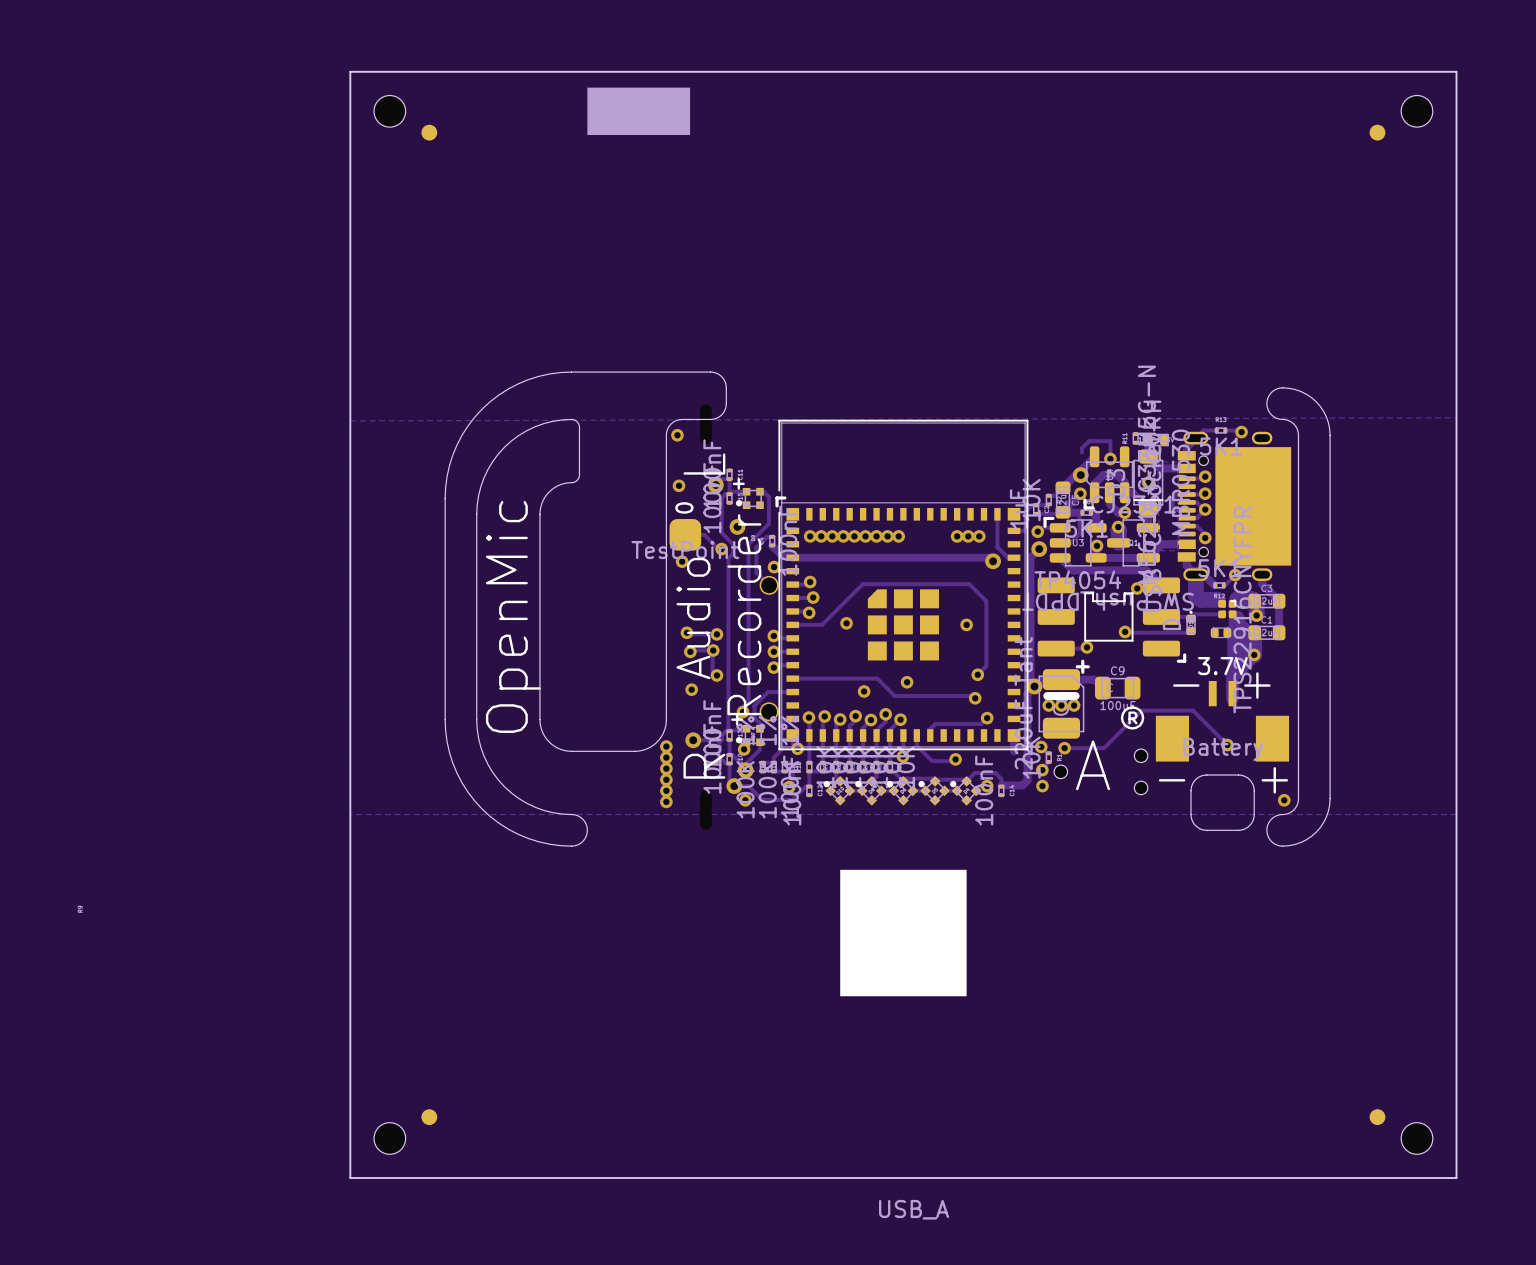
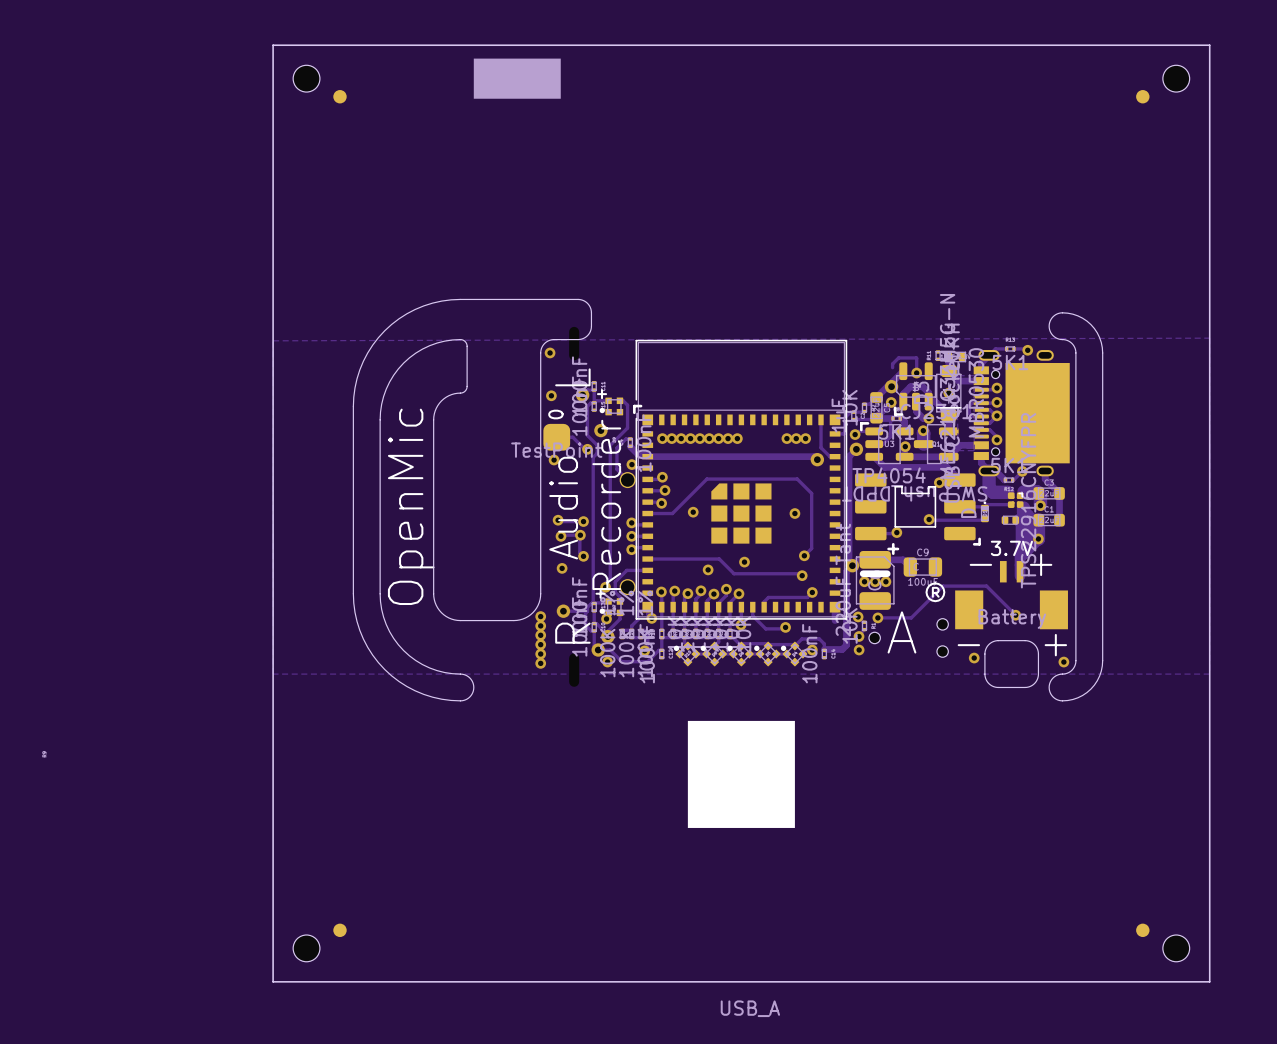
via: none -> (974, 658)

